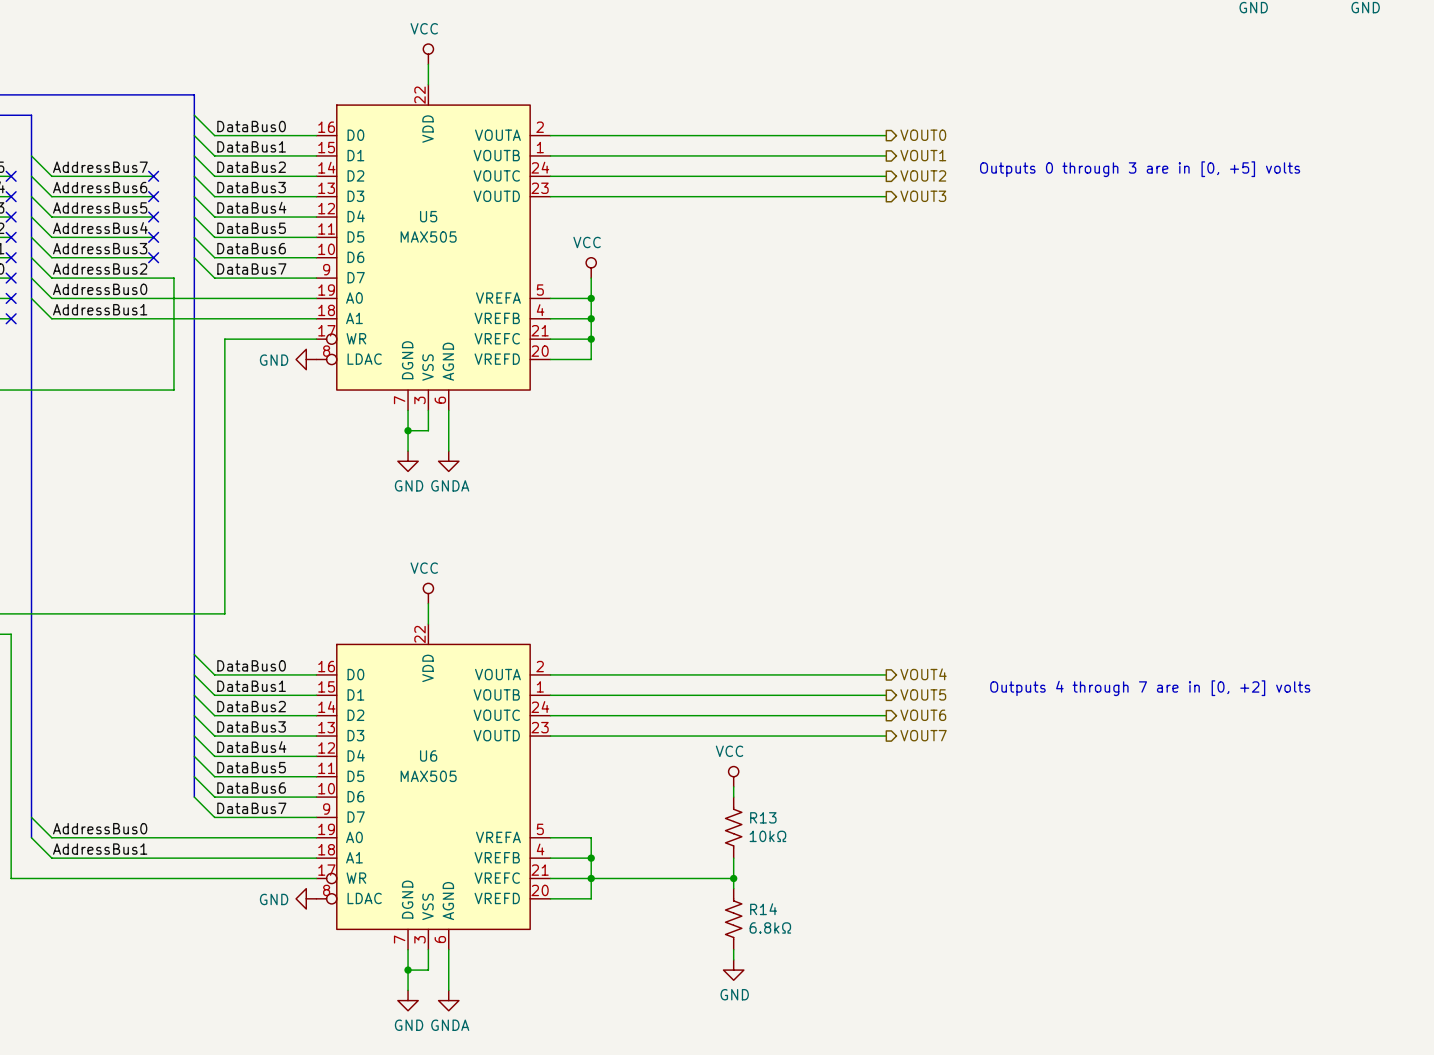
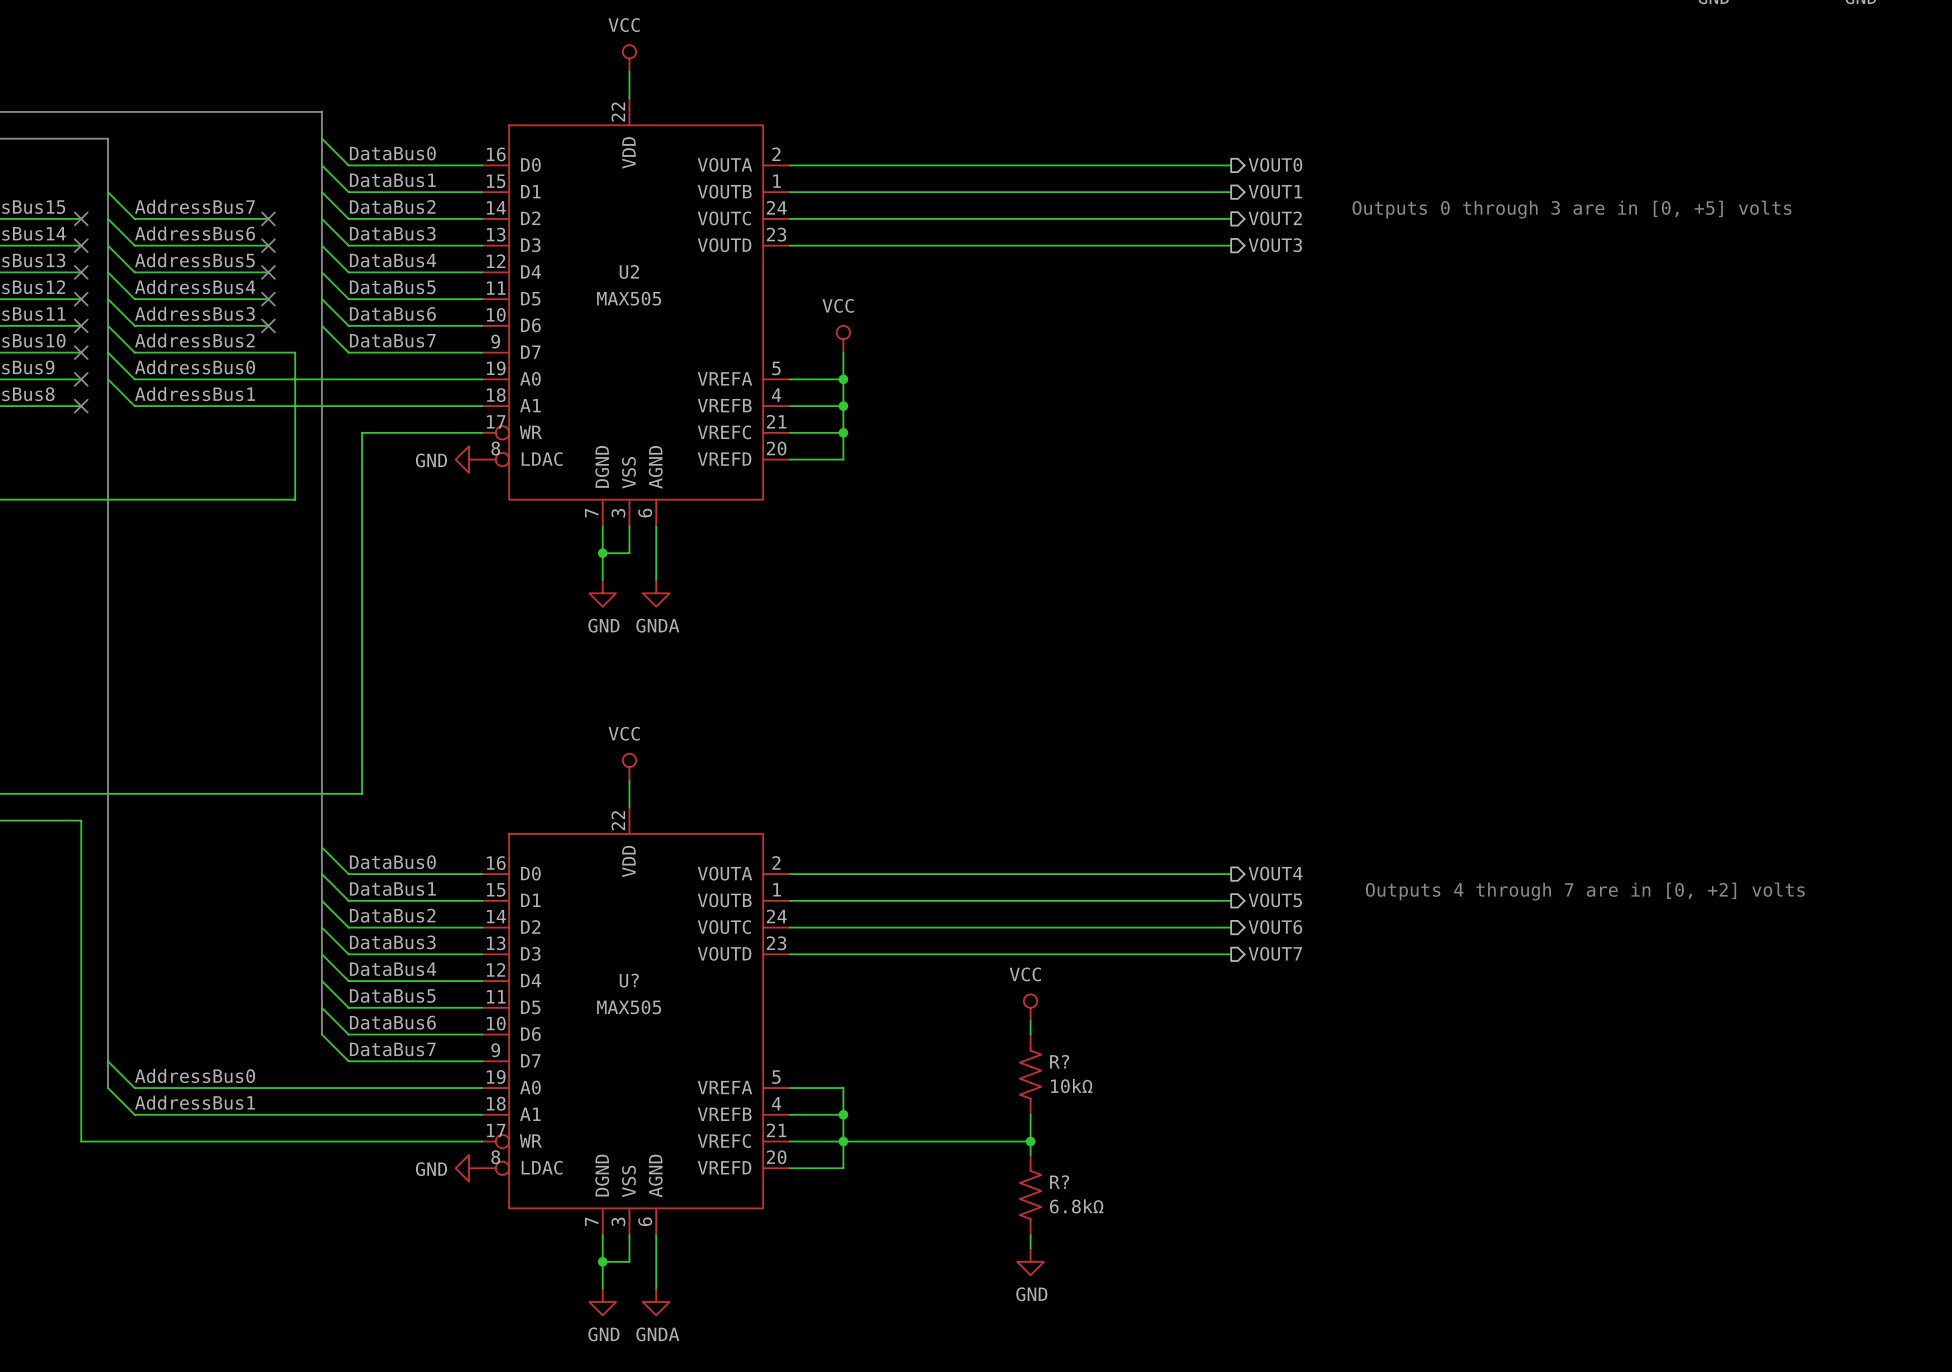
U5 name: U5 (428, 216) -> U2 (629, 271)
U6 name: U6 (428, 755) -> U? (629, 980)
R13 name: R13 (763, 817) -> R? (1059, 1061)
R14 name: R14 (763, 909) -> R? (1059, 1182)

